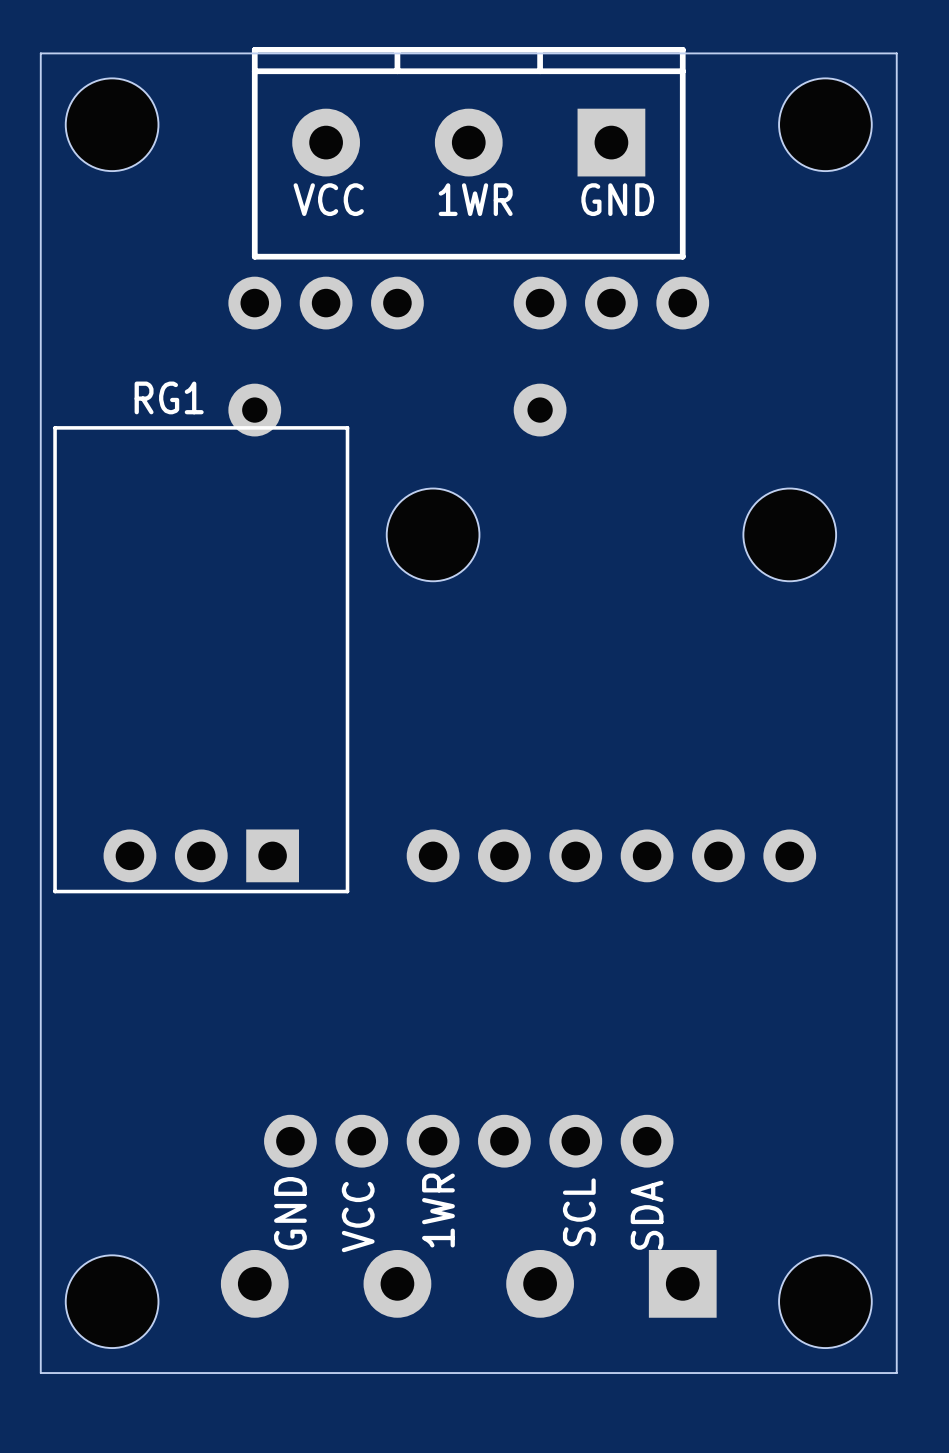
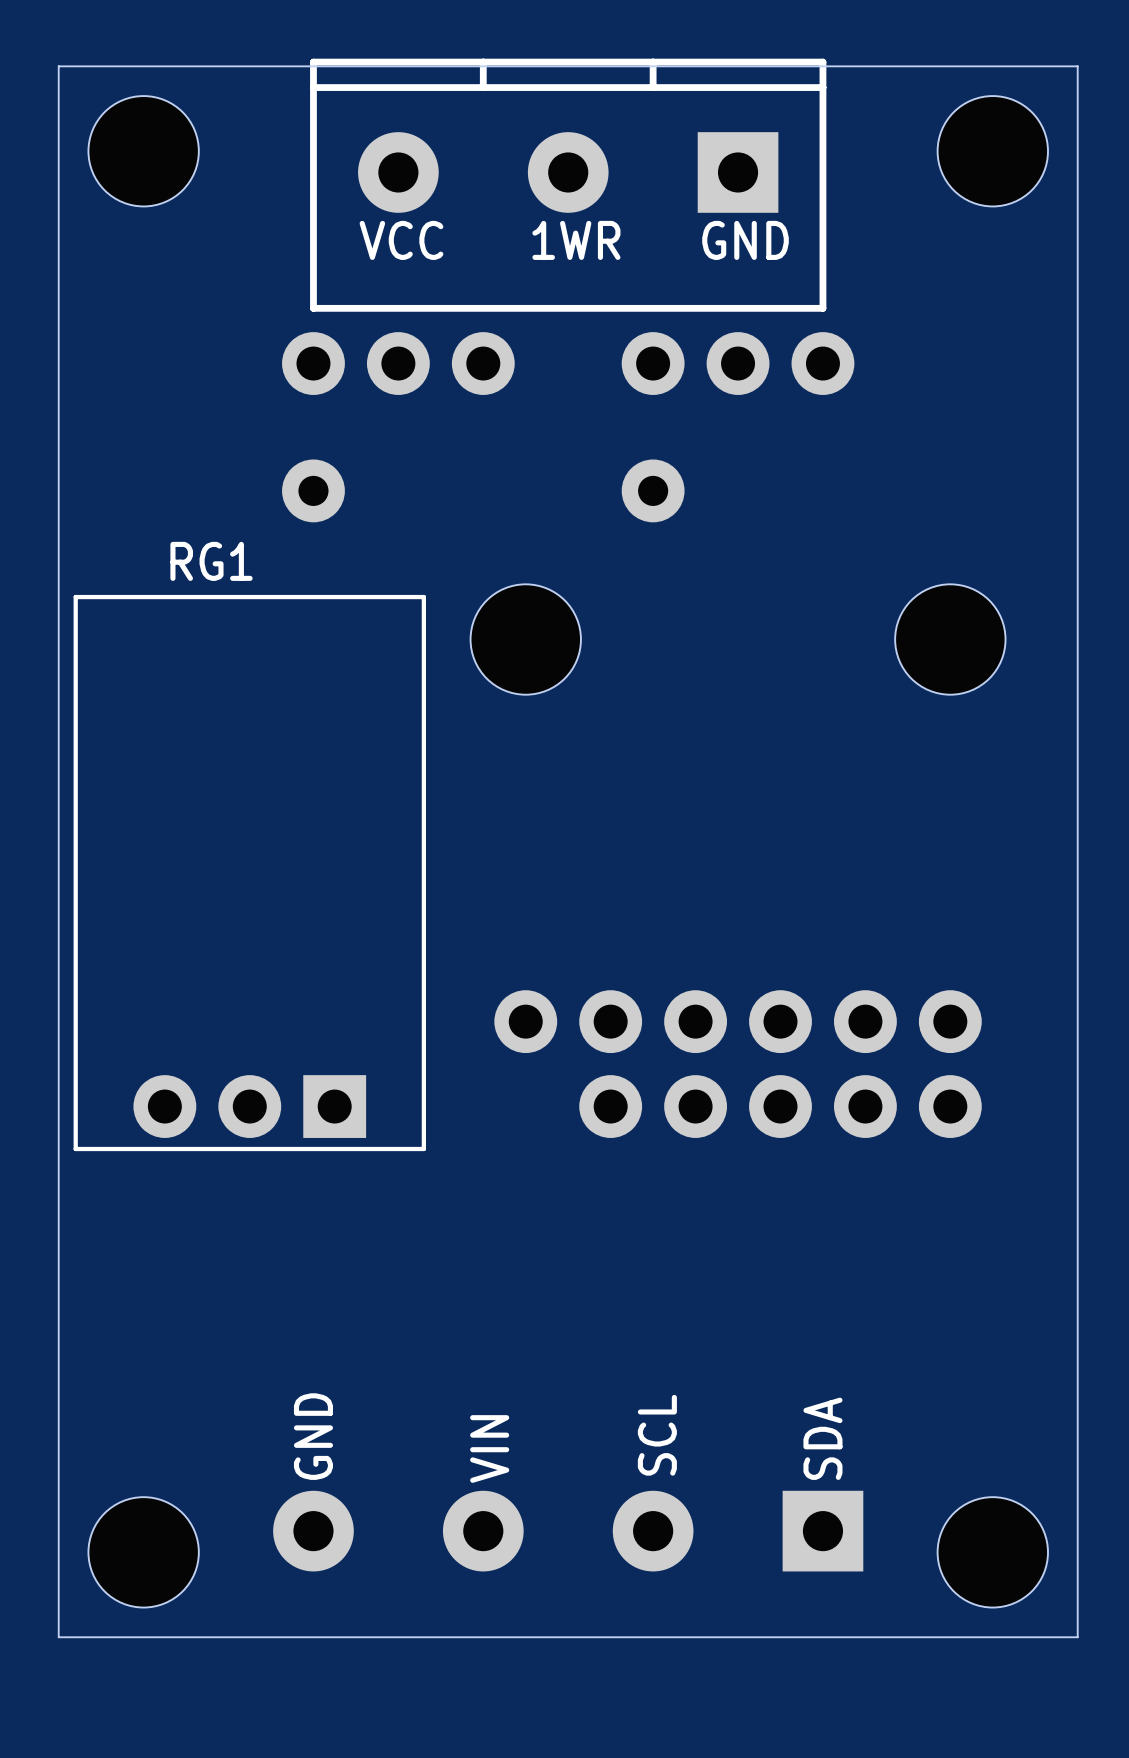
RG1 position: (201, 659) -> (249, 873)
part: none -> (780, 1106)
part: (468, 1141) -> none
text: 1WR (438, 1210) -> none
text position: SCL (579, 1212) -> SCL (657, 1435)
text position: GND (290, 1213) -> GND (313, 1436)
text: none -> VIN (489, 1448)
text position: SDA (647, 1215) -> SDA (822, 1438)
text: VCC (358, 1217) -> none

